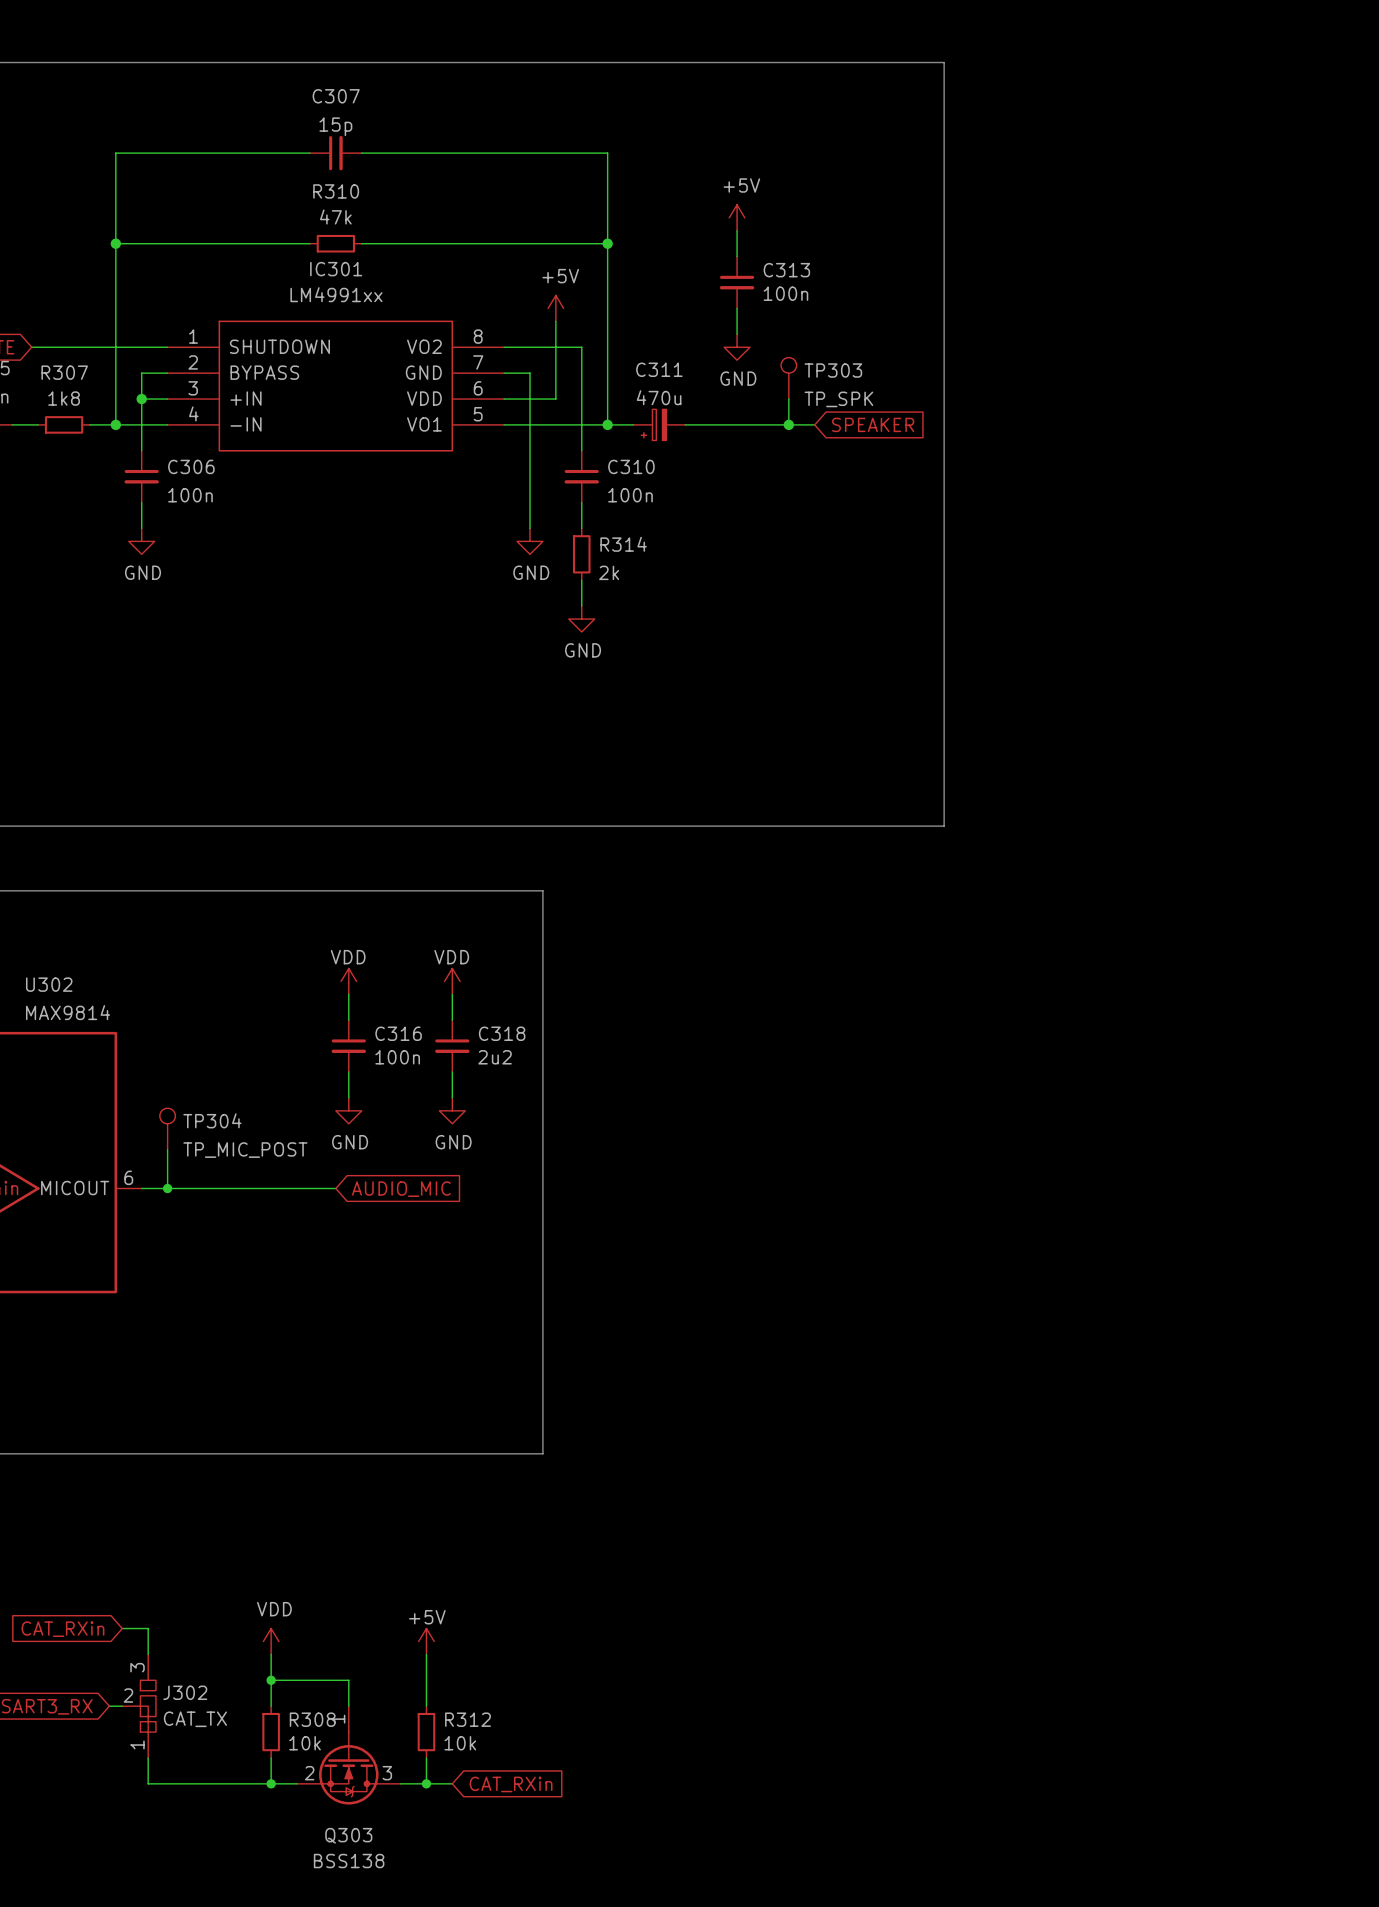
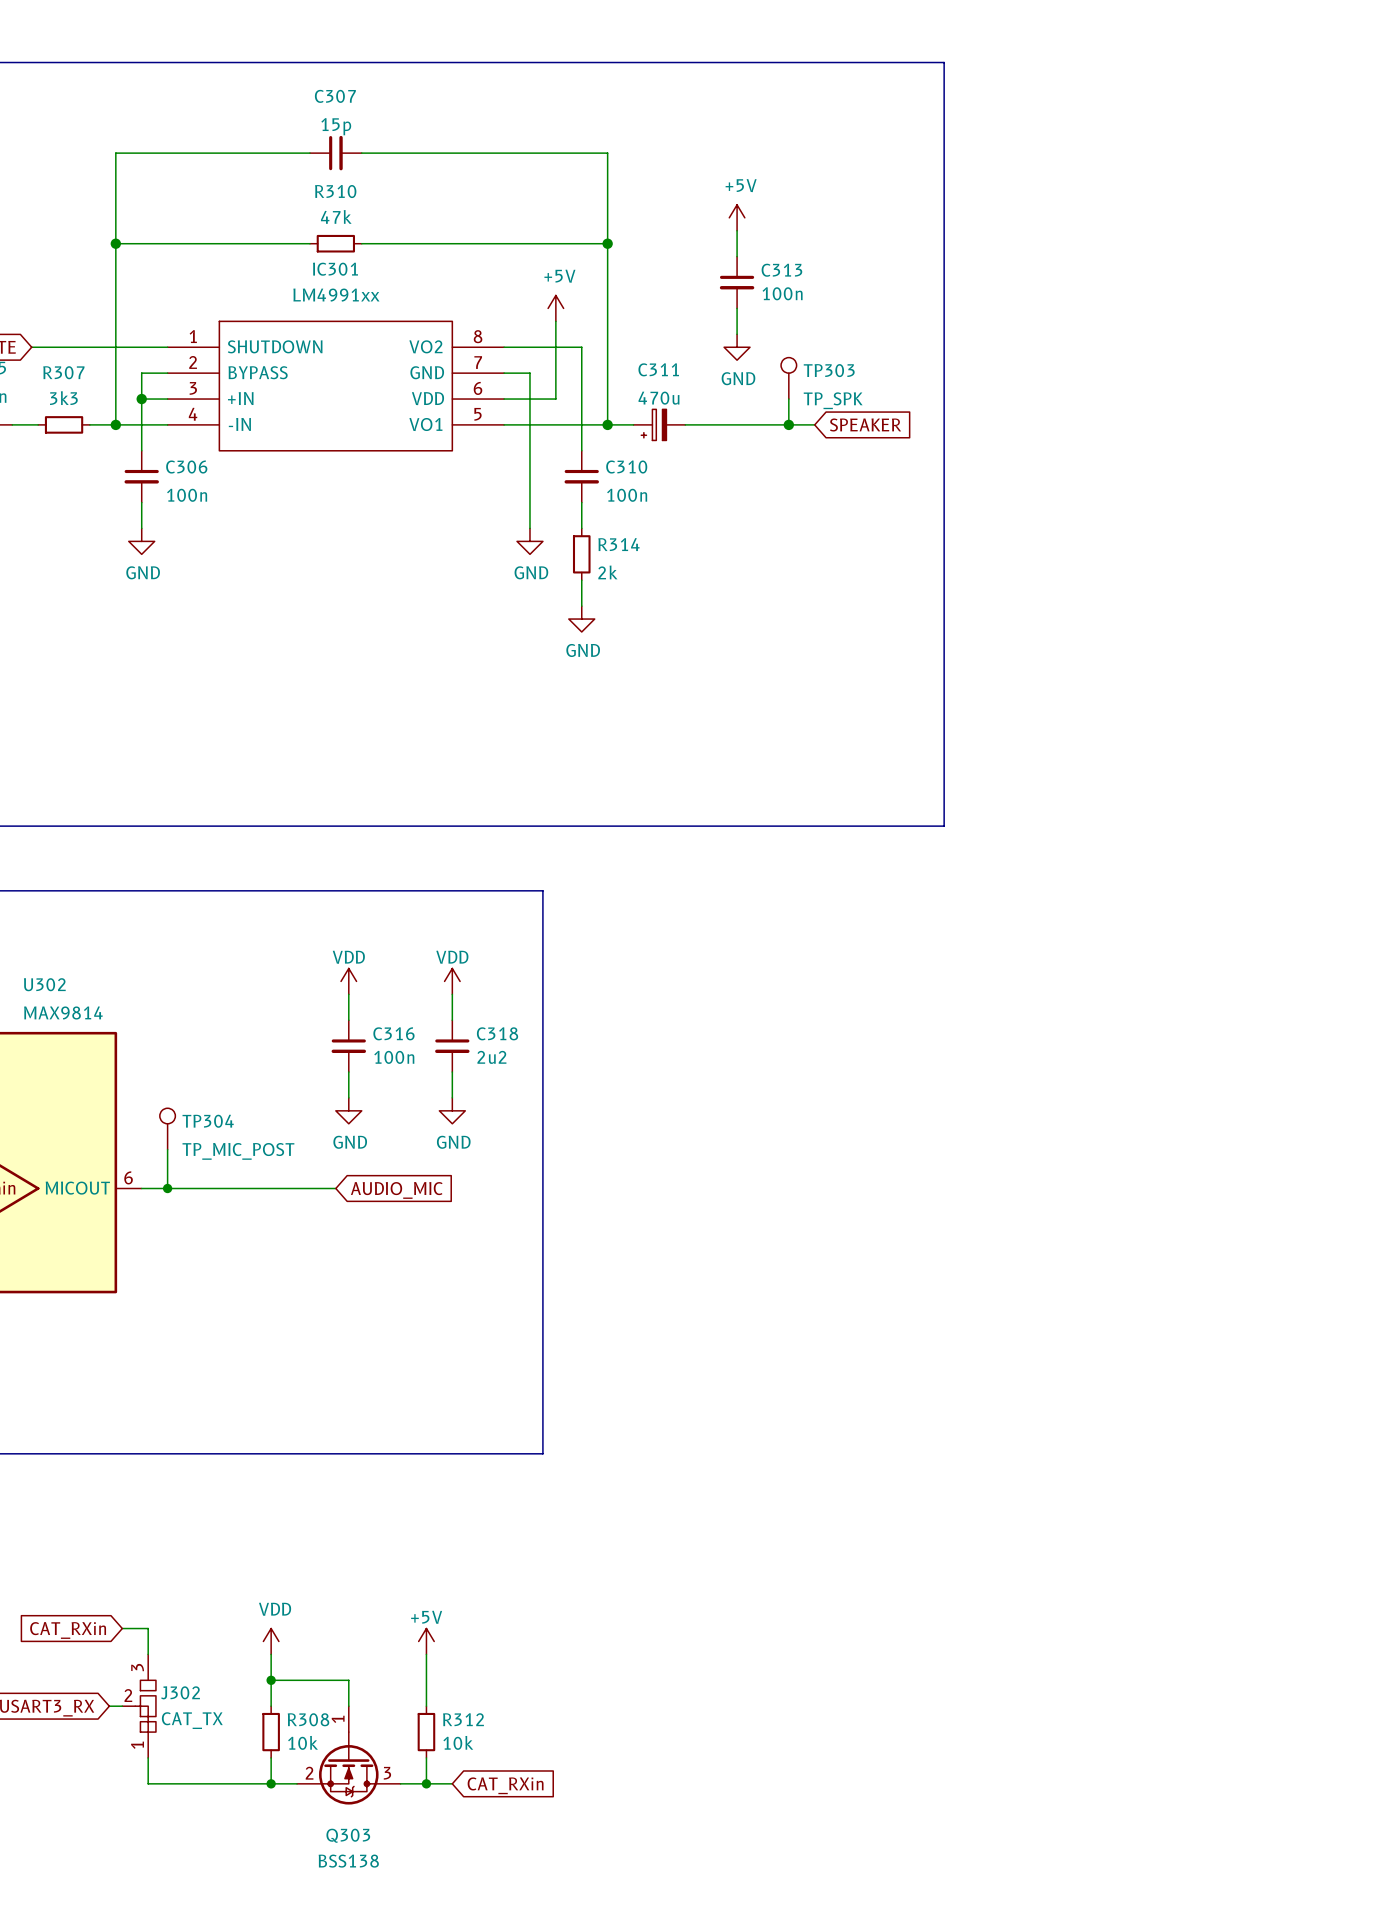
R307 value: 1k8 (64, 398) -> 3k3 (63, 398)

